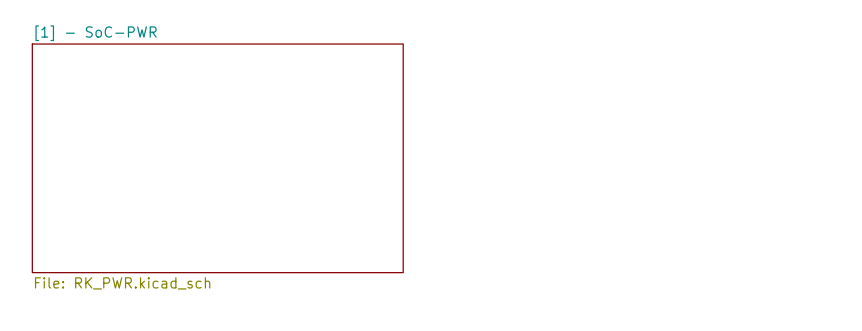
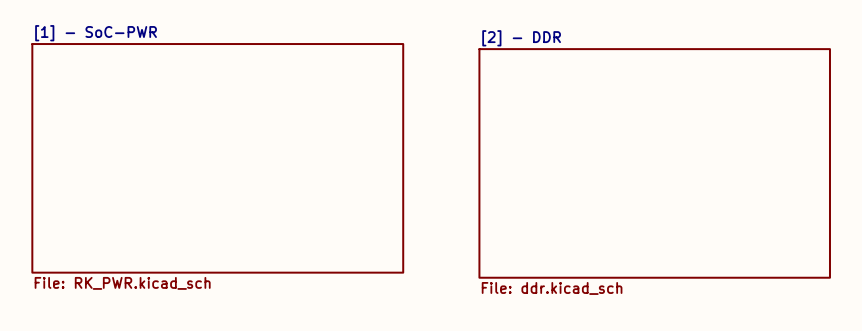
sheet [2] - DDR: none -> File: ddr.kicad_sch (654, 163)

